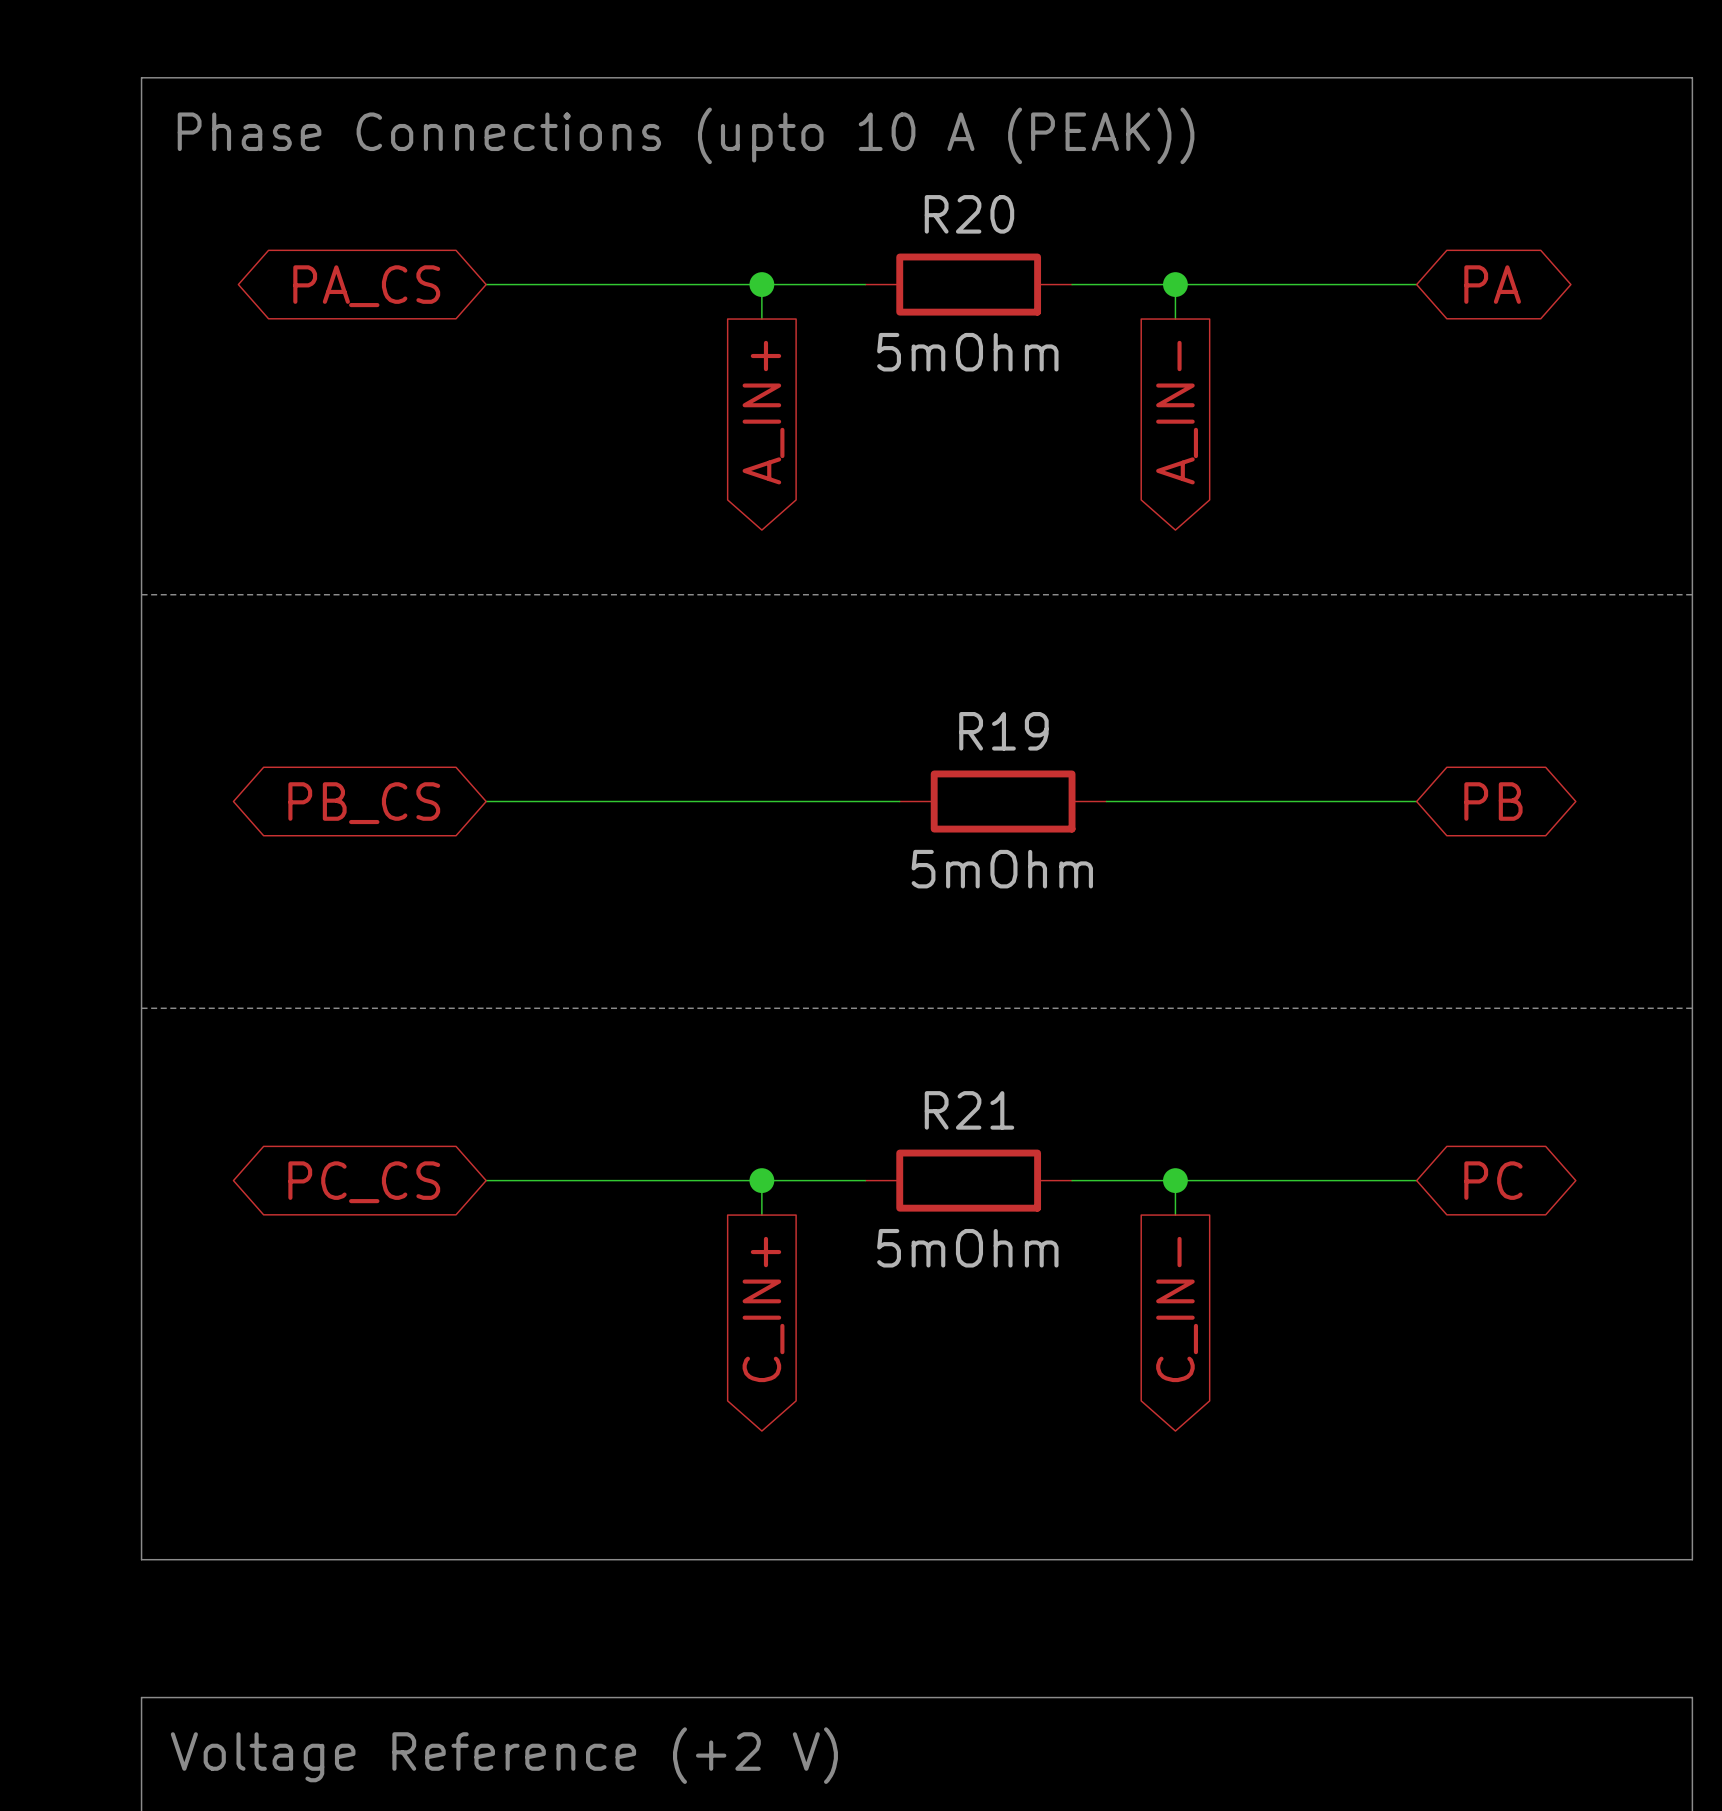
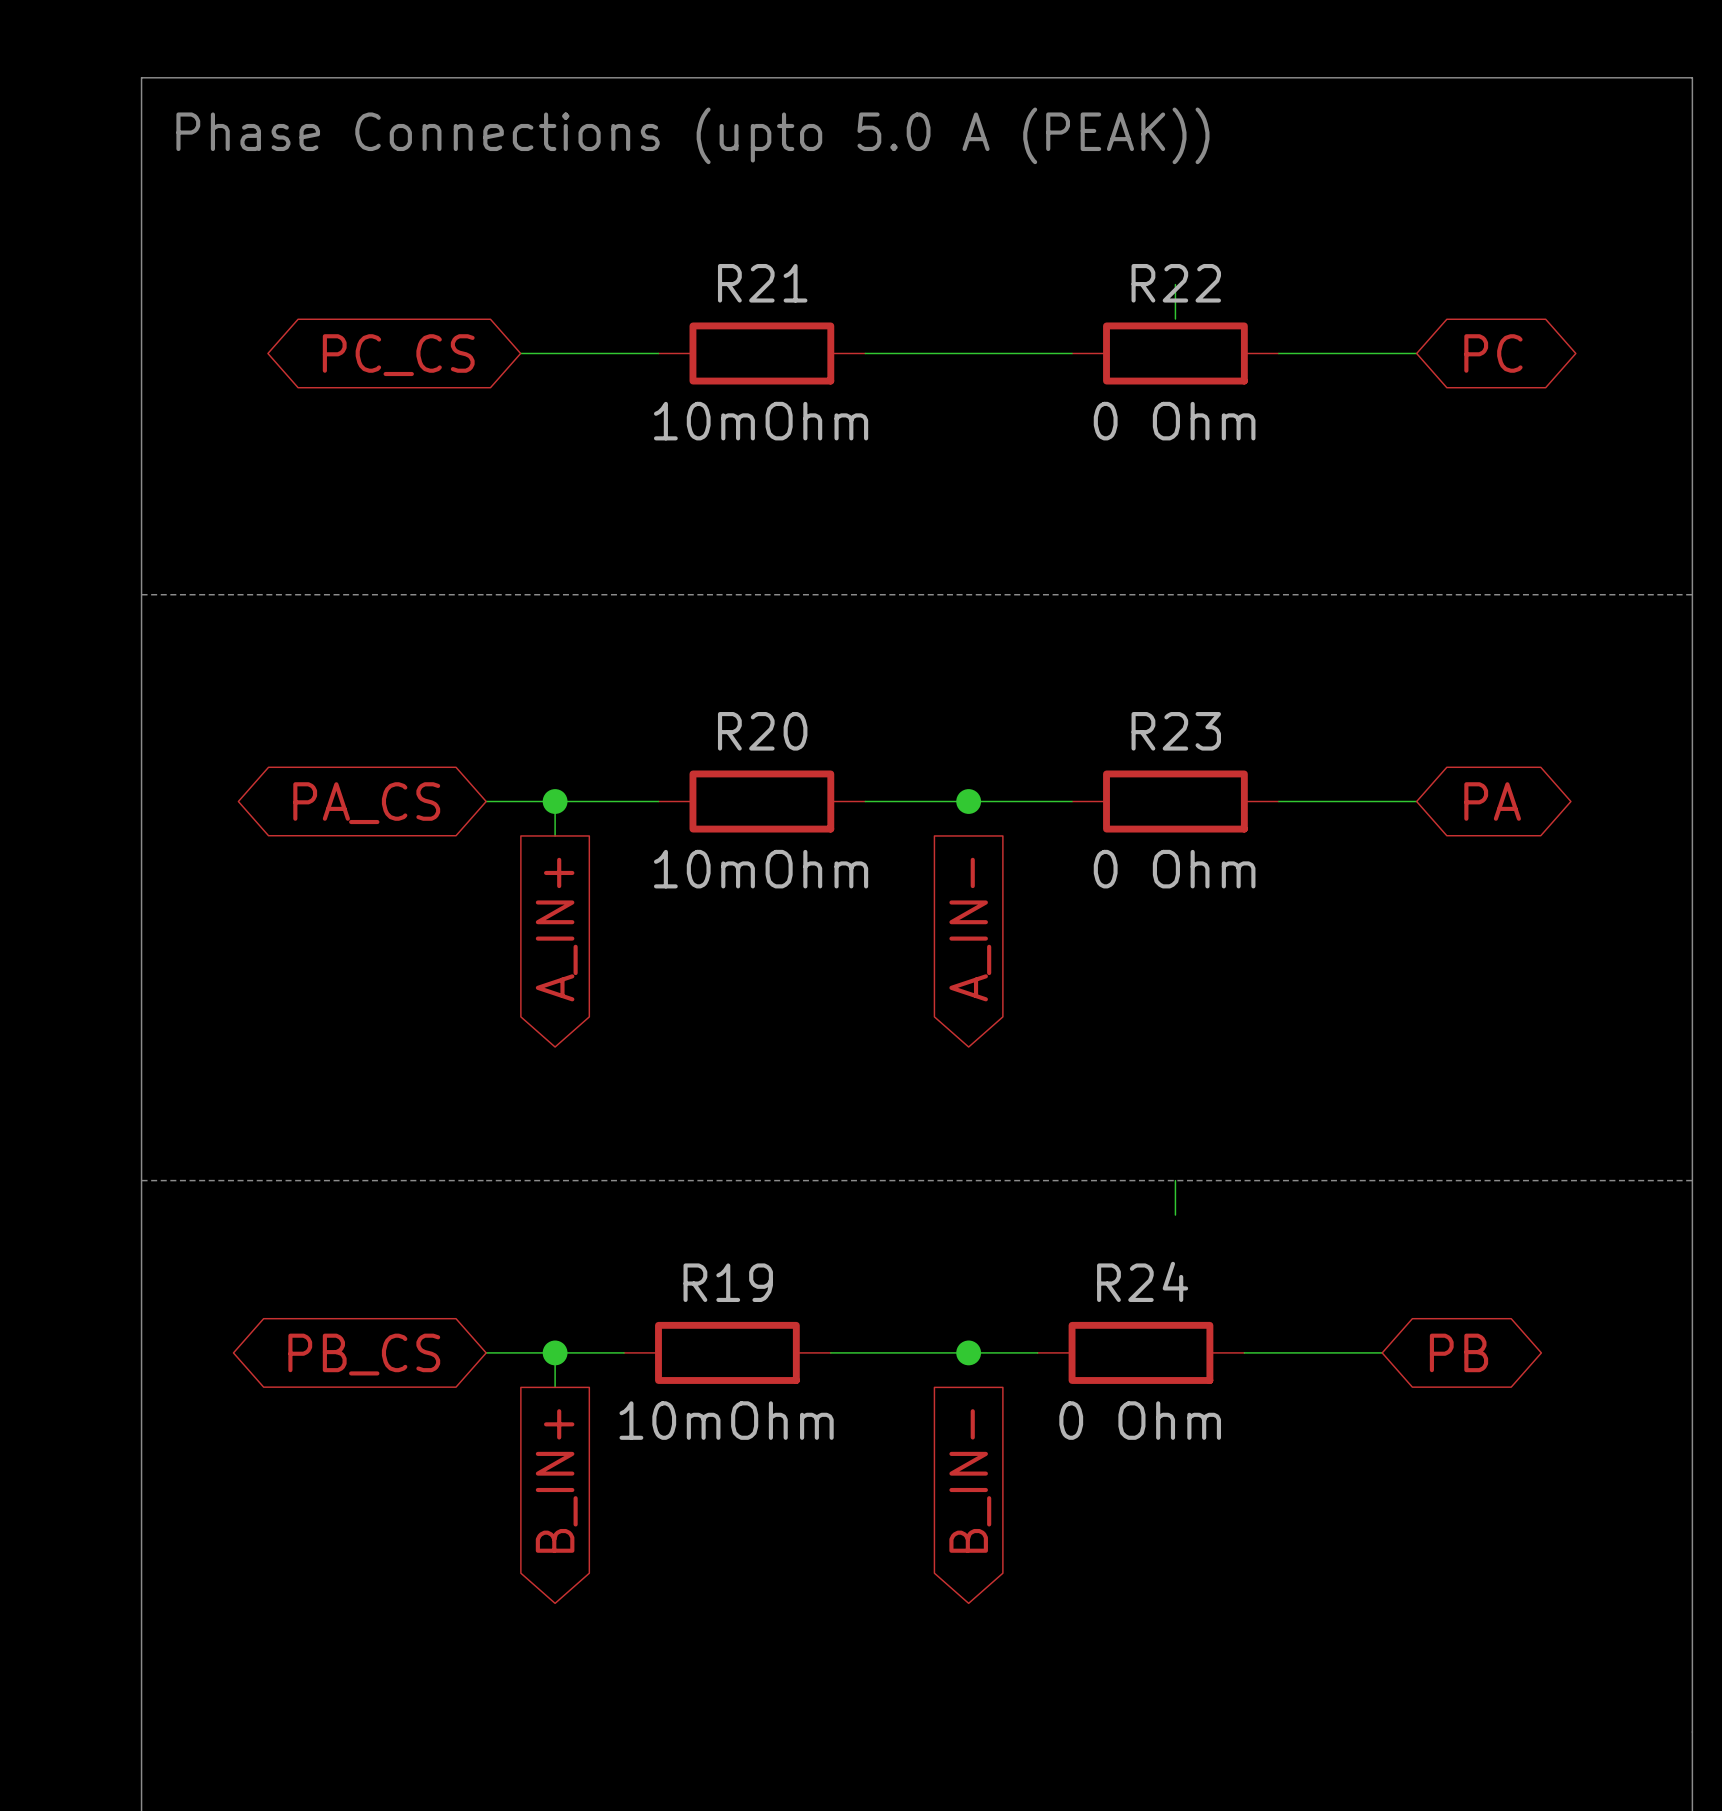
text: Phase Connections (upto 10 A (PEAK)) (686, 135) -> Phase Connections (upto 5.0 A (PEAK)) (692, 135)
wire: (486, 284) (865, 284) -> none
wire: (761, 284) (761, 319) -> (555, 801) (555, 835)
junction: (761, 284) -> none
R20 position: (968, 284) -> (761, 801)
wire: (1072, 284) (1416, 284) -> none
junction: (1175, 284) -> none
global label: PA (1492, 284) -> none
global label: PA_CS (366, 286) -> PC_CS (398, 355)
R20 value: 5mOhm (967, 352) -> 10mOhm (761, 869)
wire: none -> (520, 353) (658, 353)
R22: none -> 0 Ohm (1175, 353)
wire: none -> (1278, 353) (1416, 353)
global label: none -> PC (1493, 353)
global label position: A_IN+ (763, 412) -> A_IN+ (556, 929)
global label position: A_IN- (1177, 412) -> A_IN- (970, 929)
junction: none -> (555, 801)
wire: (658, 801) (865, 801) -> (865, 353) (1072, 353)
junction: none -> (968, 801)
R19 position: (1003, 801) -> (727, 1352)
wire: (1106, 801) (1278, 801) -> (899, 801) (1072, 801)
R23: none -> 0 Ohm (1175, 801)
global label: PB (1493, 801) -> PA (1492, 801)
global label: PB_CS (364, 803) -> PA_CS (366, 803)
R19 value: 5mOhm (1002, 869) -> 10mOhm (726, 1420)
line: (141, 1008) (1692, 1008) -> (141, 1180) (1692, 1180)
wire: (761, 1180) (761, 1215) -> (555, 1352) (555, 1387)
junction: (761, 1180) -> none
R21 position: (968, 1180) -> (761, 353)
junction: (1175, 1180) -> none
global label: PC (1493, 1180) -> none
global label: PC_CS (364, 1182) -> none
R21 value: 5mOhm (967, 1248) -> 10mOhm (761, 421)
global label: C_IN+ (763, 1309) -> none
global label: C_IN- (1177, 1309) -> none
wire: none -> (486, 1352) (624, 1352)
junction: none -> (555, 1352)
wire: none -> (830, 1352) (1037, 1352)
junction: none -> (968, 1352)
R24: none -> 0 Ohm (1140, 1352)
wire: none -> (1244, 1352) (1382, 1352)
global label: none -> PB (1458, 1352)
global label: none -> PB_CS (364, 1354)
global label: none -> B_IN+ (556, 1480)
global label: none -> B_IN- (970, 1480)
line: (141, 1559) (1692, 1559) -> (141, 1559) (141, 1697)
line: (141, 1697) (1692, 1697) -> (1692, 1559) (1692, 1697)
text: Voltage Reference (+2 V) (504, 1755) -> none

